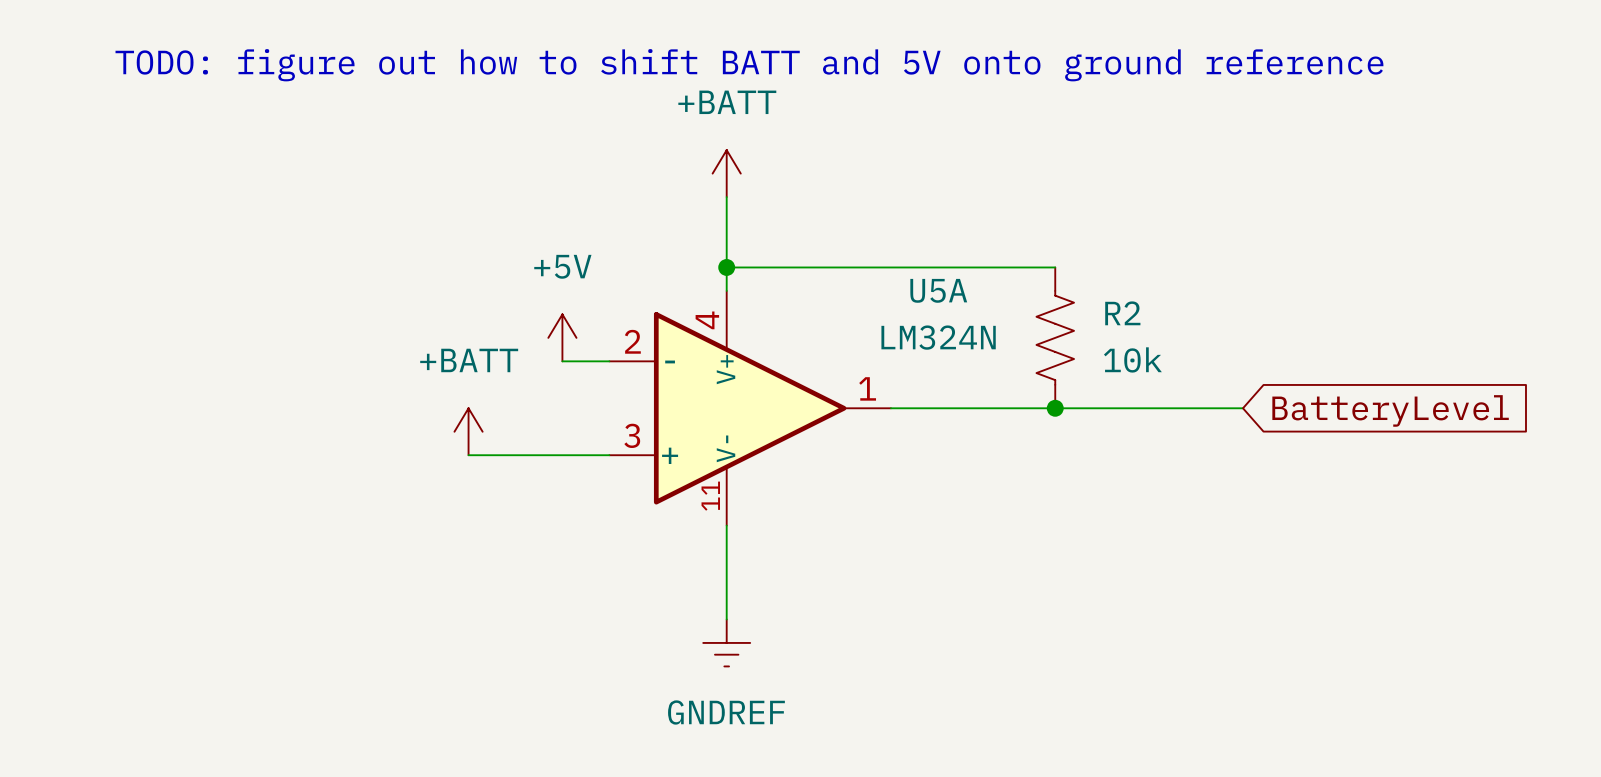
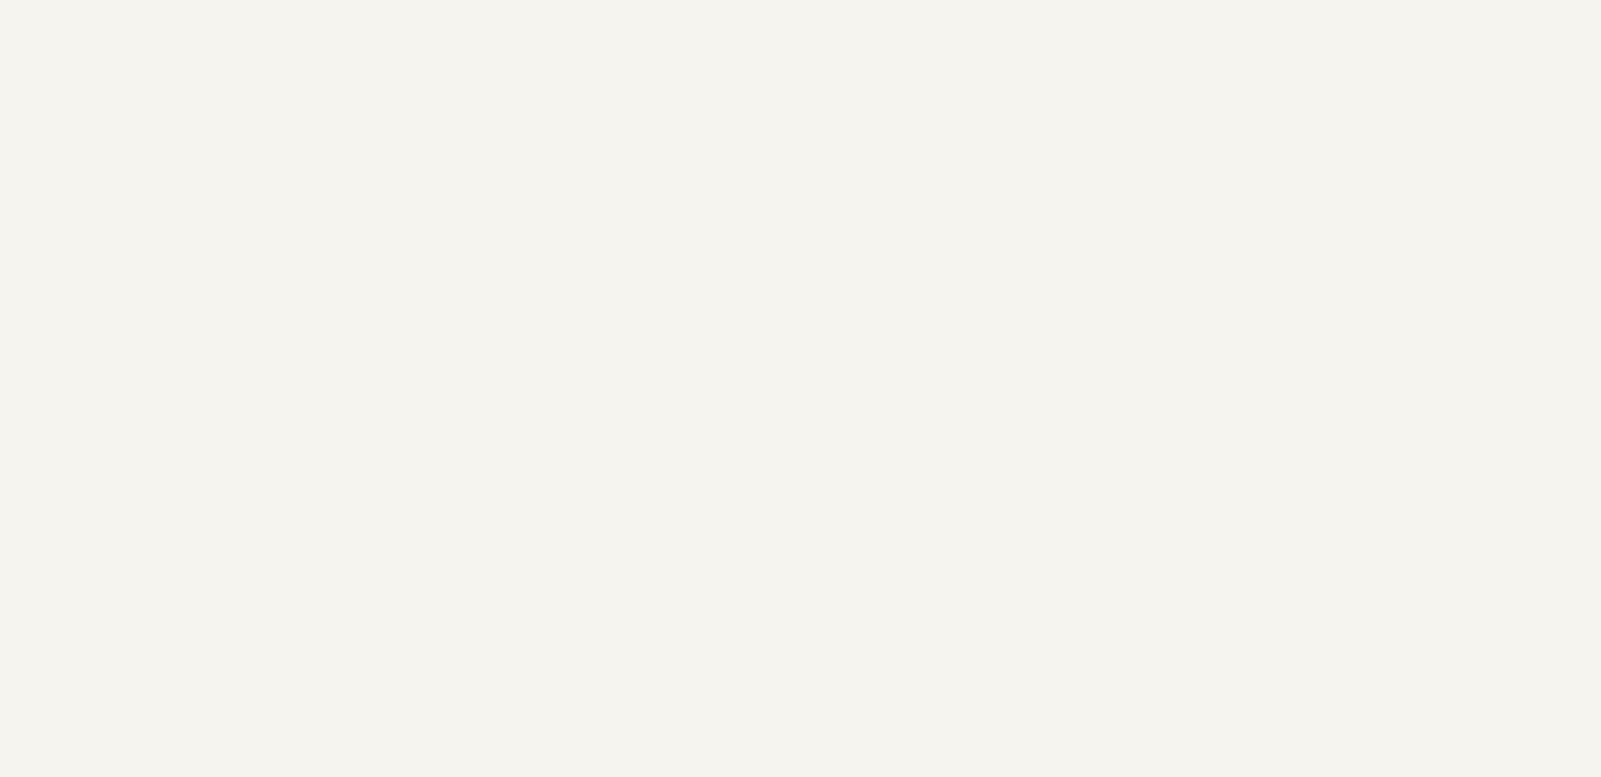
text: TODO: figure out how to shift BATT and 5V onto ground reference (749, 65) -> none
power symbol: +BATT (726, 173) -> none
wire: (726, 197) (726, 290) -> none
wire: (726, 267) (1055, 267) -> none
junction: (726, 267) -> none
power symbol: +5V (562, 337) -> none
R2: 10k (1055, 337) -> none
wire: (562, 361) (609, 361) -> none
U5A: LM324N (750, 408) -> none
wire: (890, 408) (1243, 408) -> none
junction: (1055, 408) -> none
global label: BatteryLevel (1390, 410) -> none
power symbol: +BATT (468, 431) -> none
wire: (468, 455) (609, 455) -> none
wire: (726, 525) (726, 619) -> none
power symbol: GNDREF (726, 642) -> none

